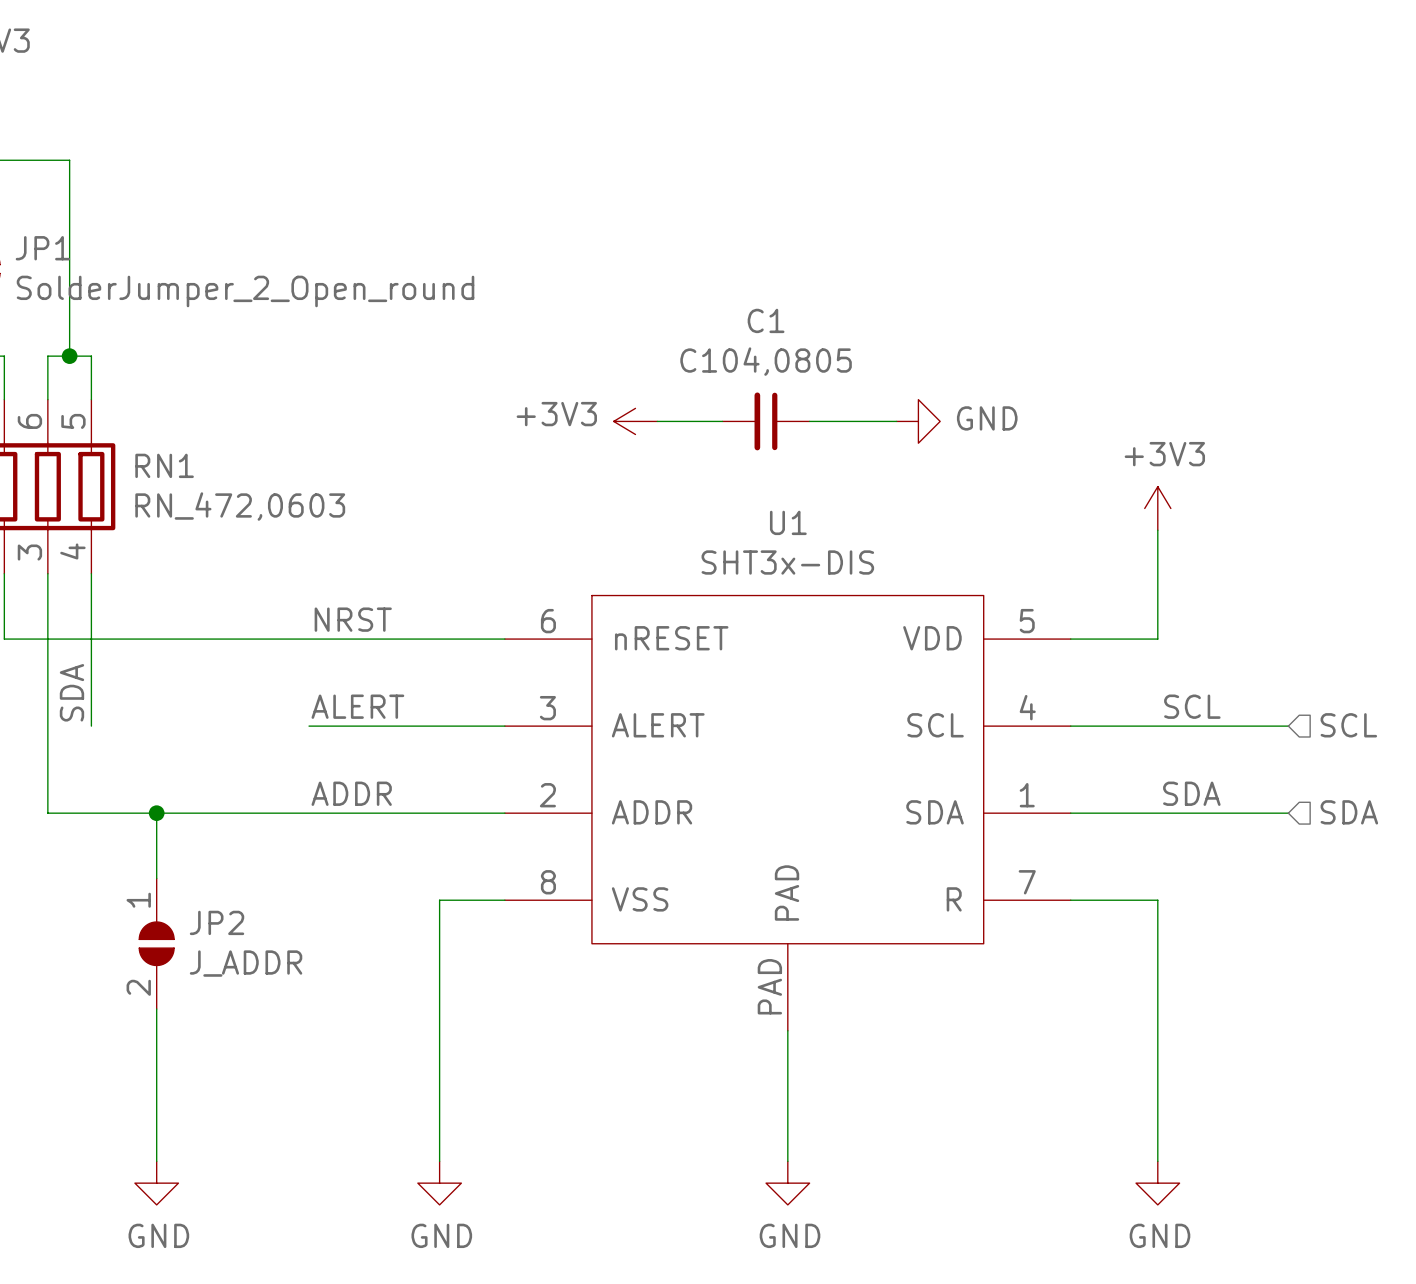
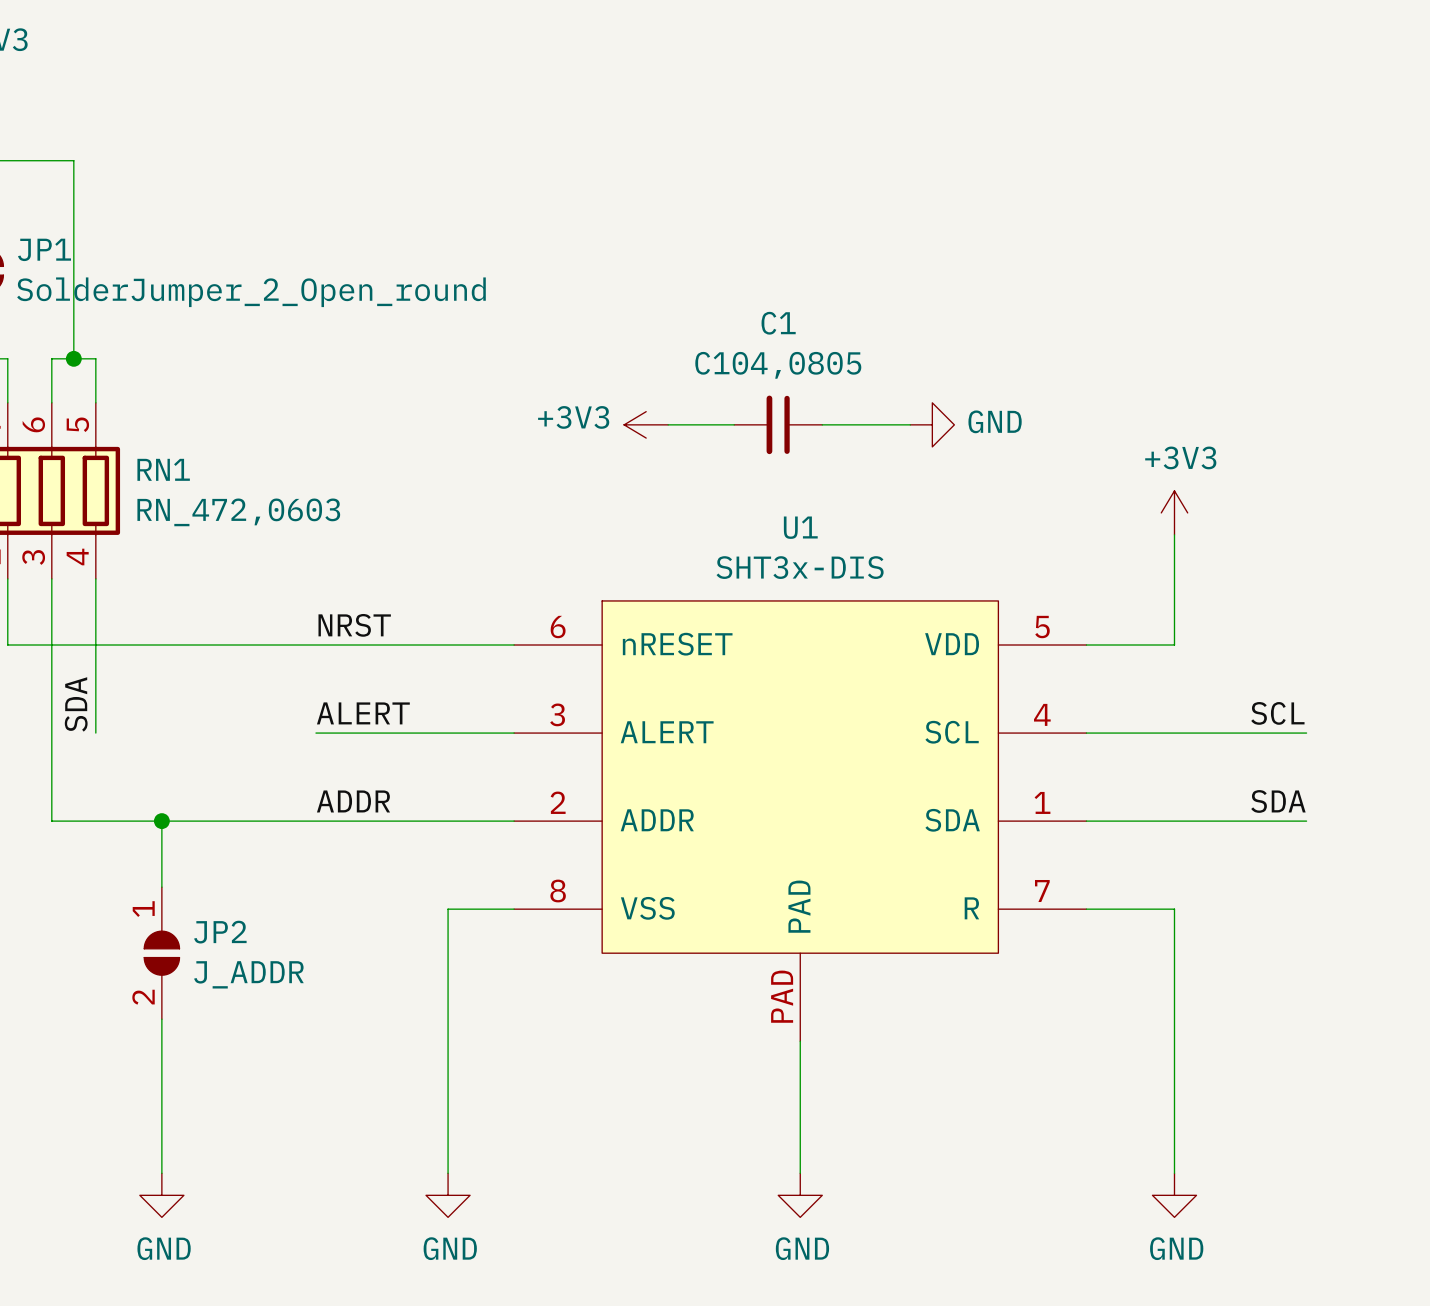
label position: SCL (1192, 706) -> SCL (1277, 713)
hierarchical label: SCL (1348, 725) -> none
label position: SDA (1191, 793) -> SDA (1278, 801)
hierarchical label: SDA (1349, 812) -> none

